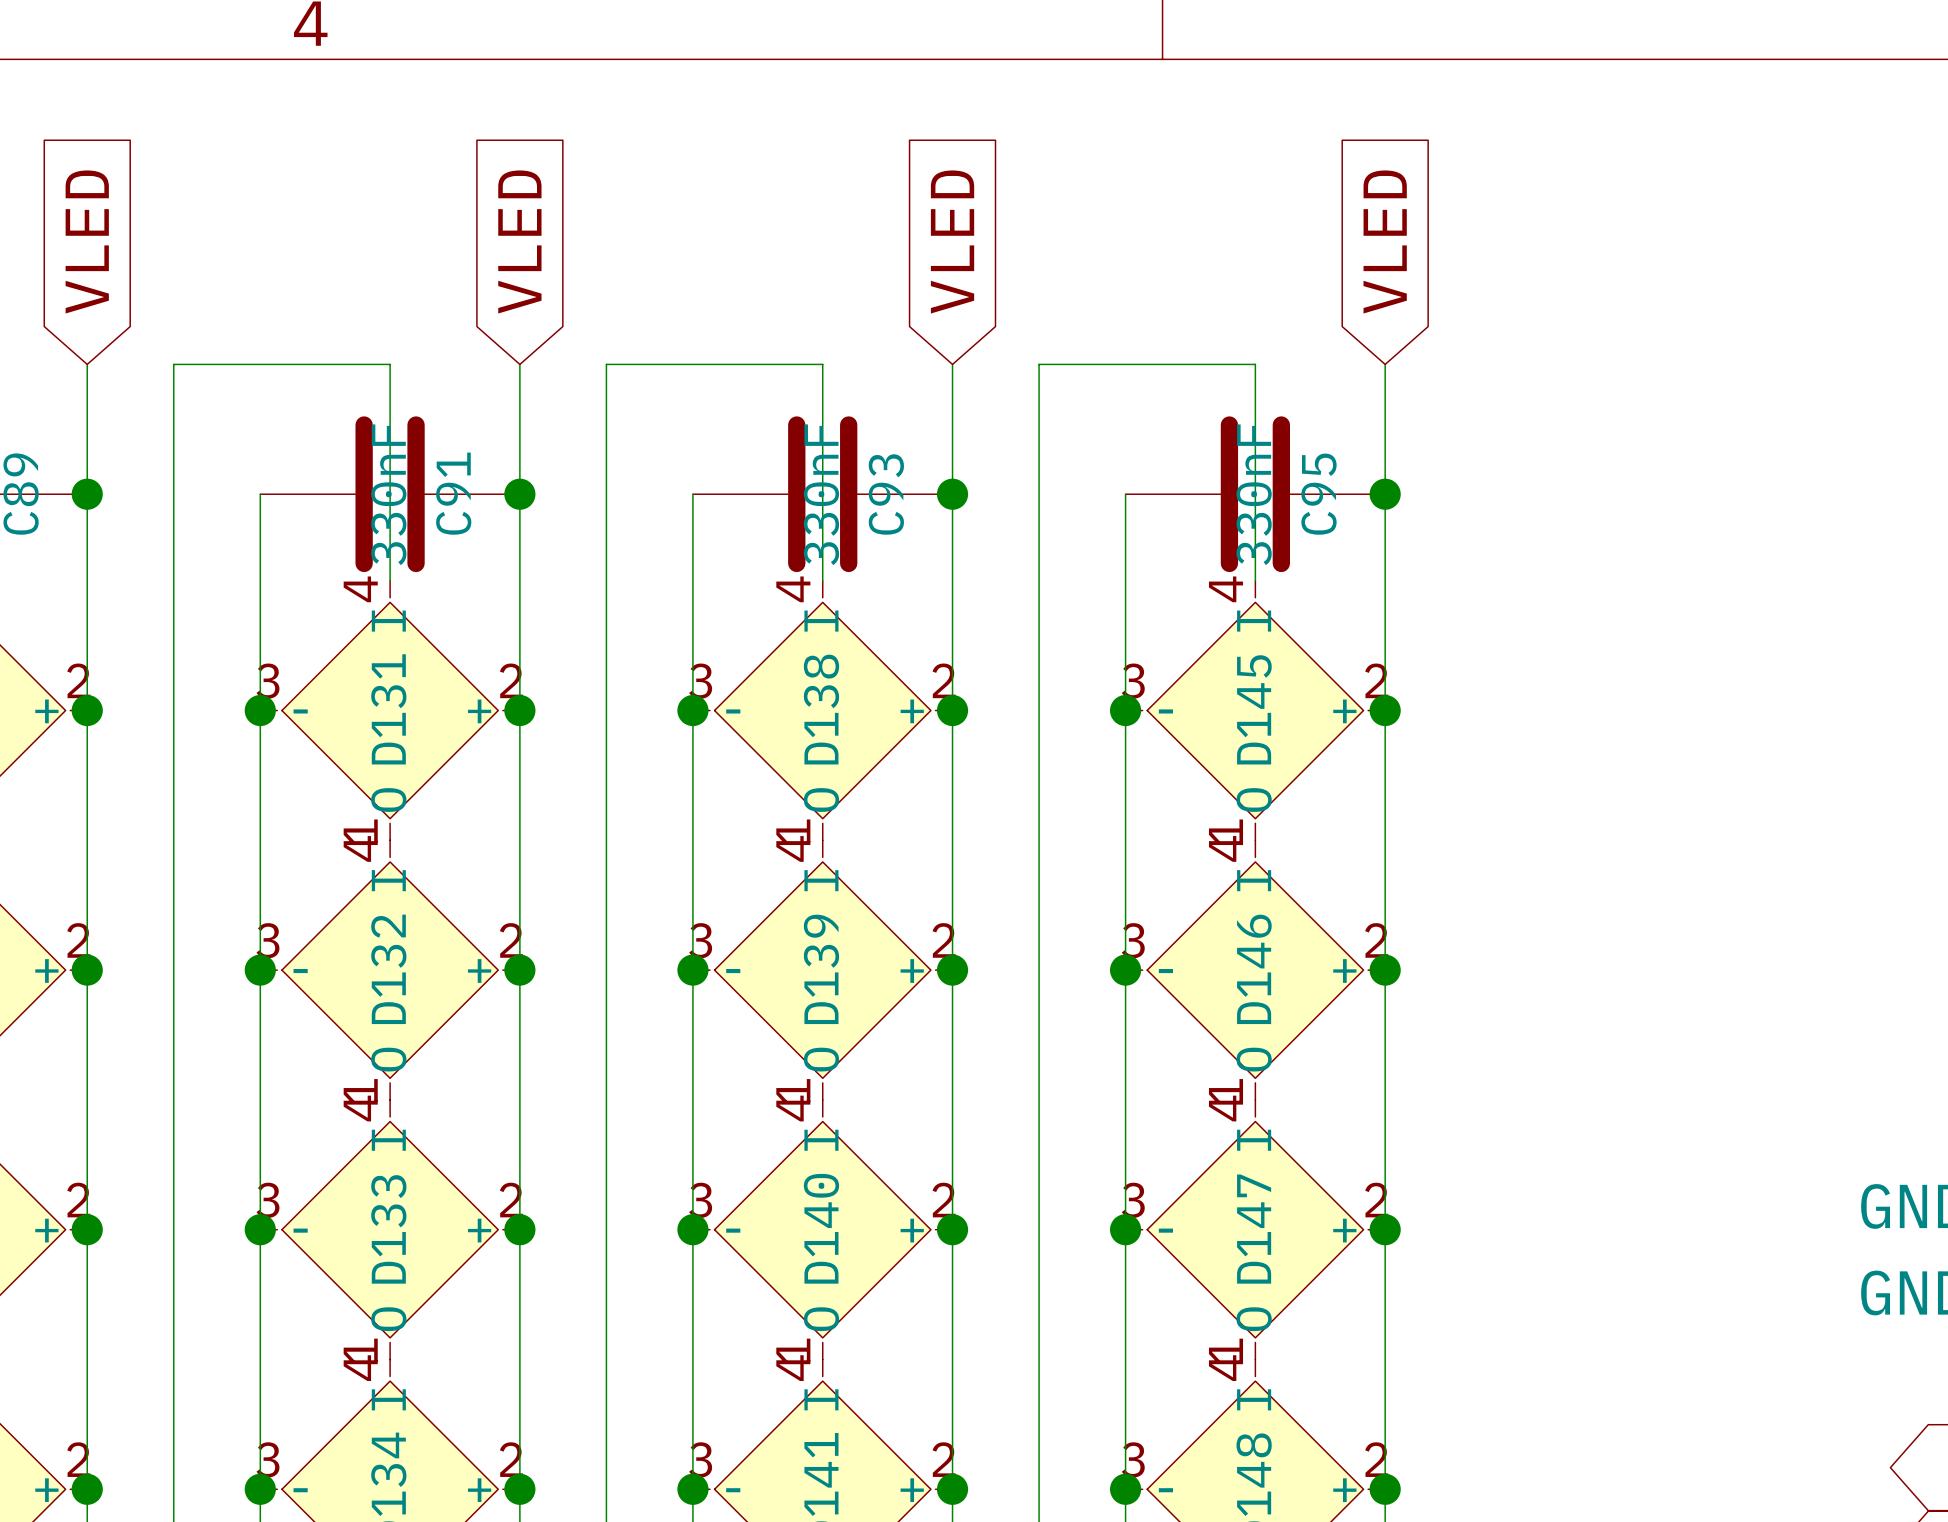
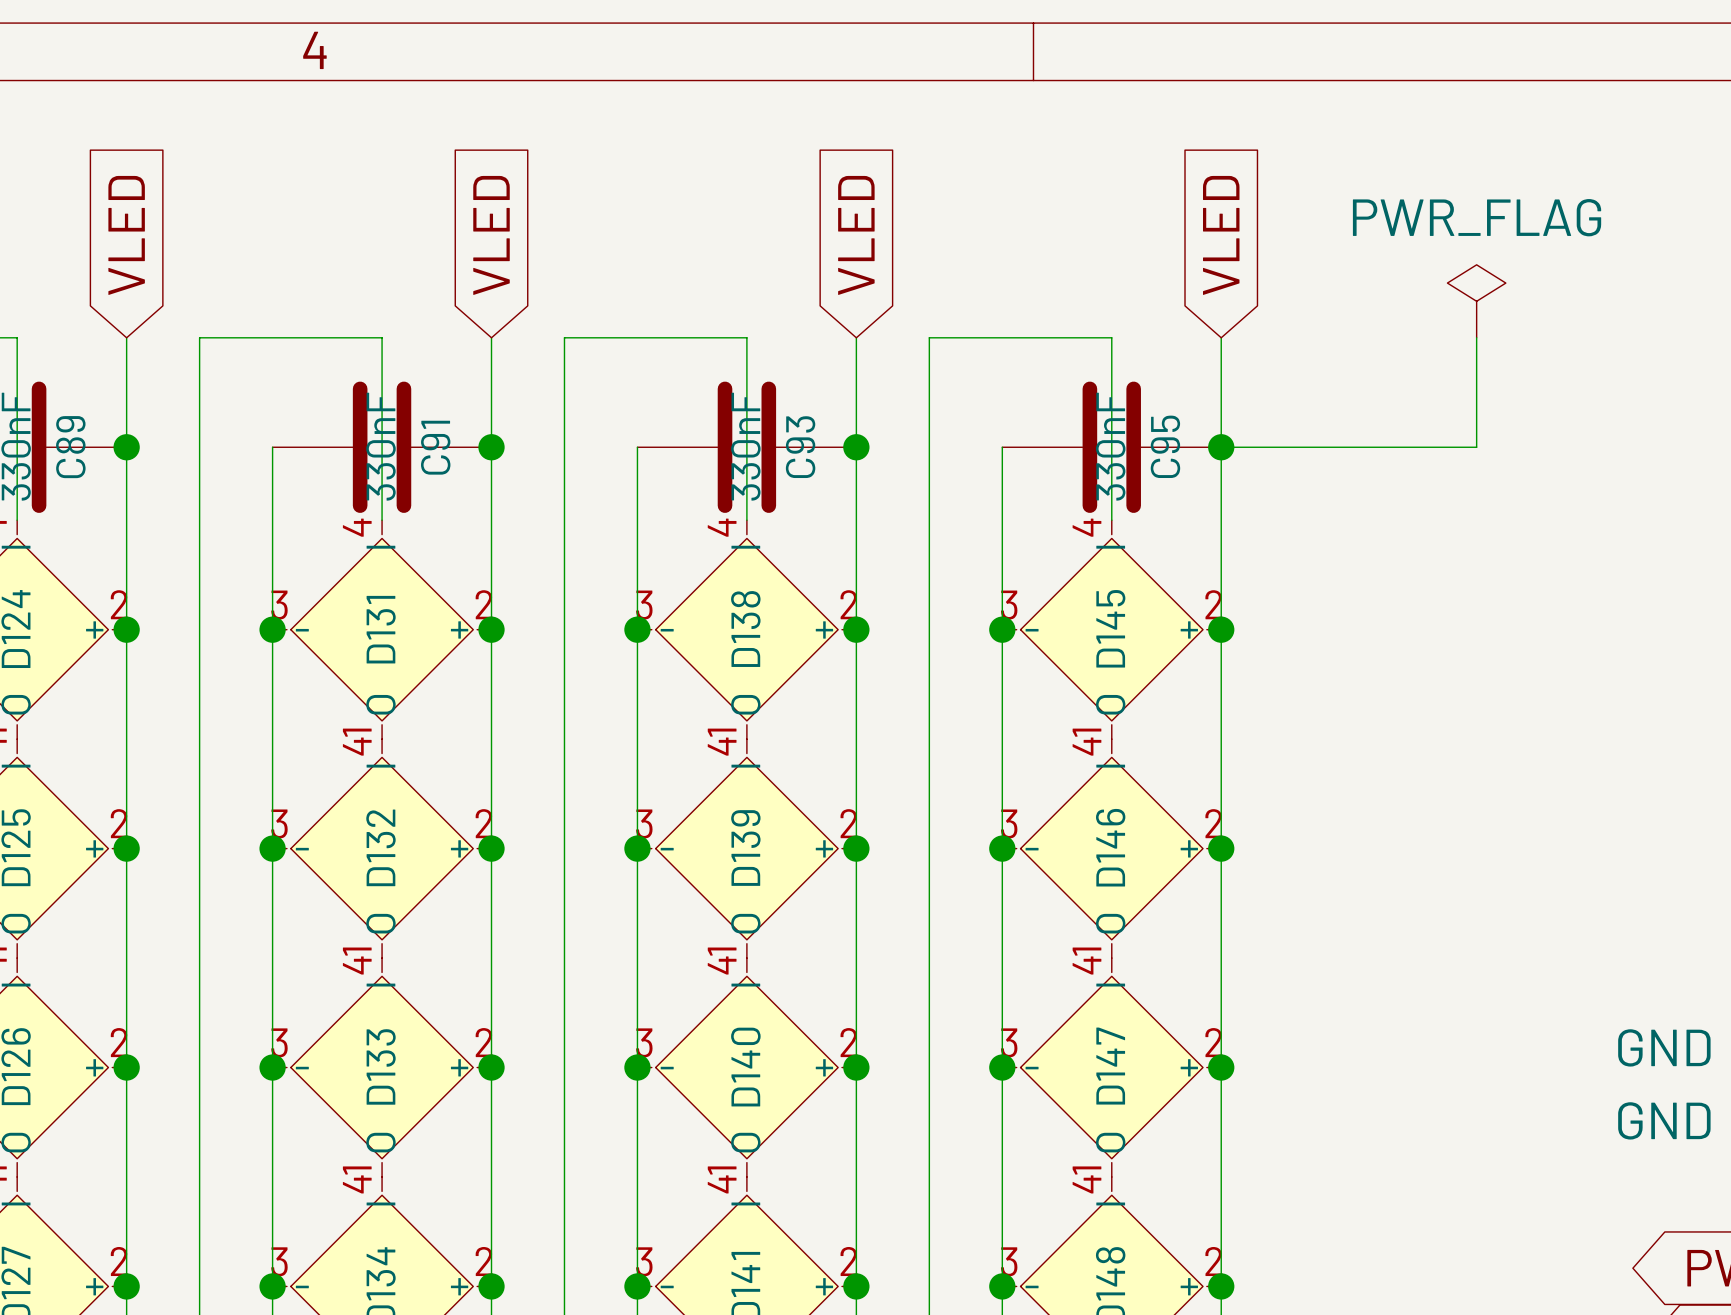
power symbol: none -> PWR_FLAG (1476, 301)
wire: none -> (1476, 337) (1476, 447) (1221, 447)

